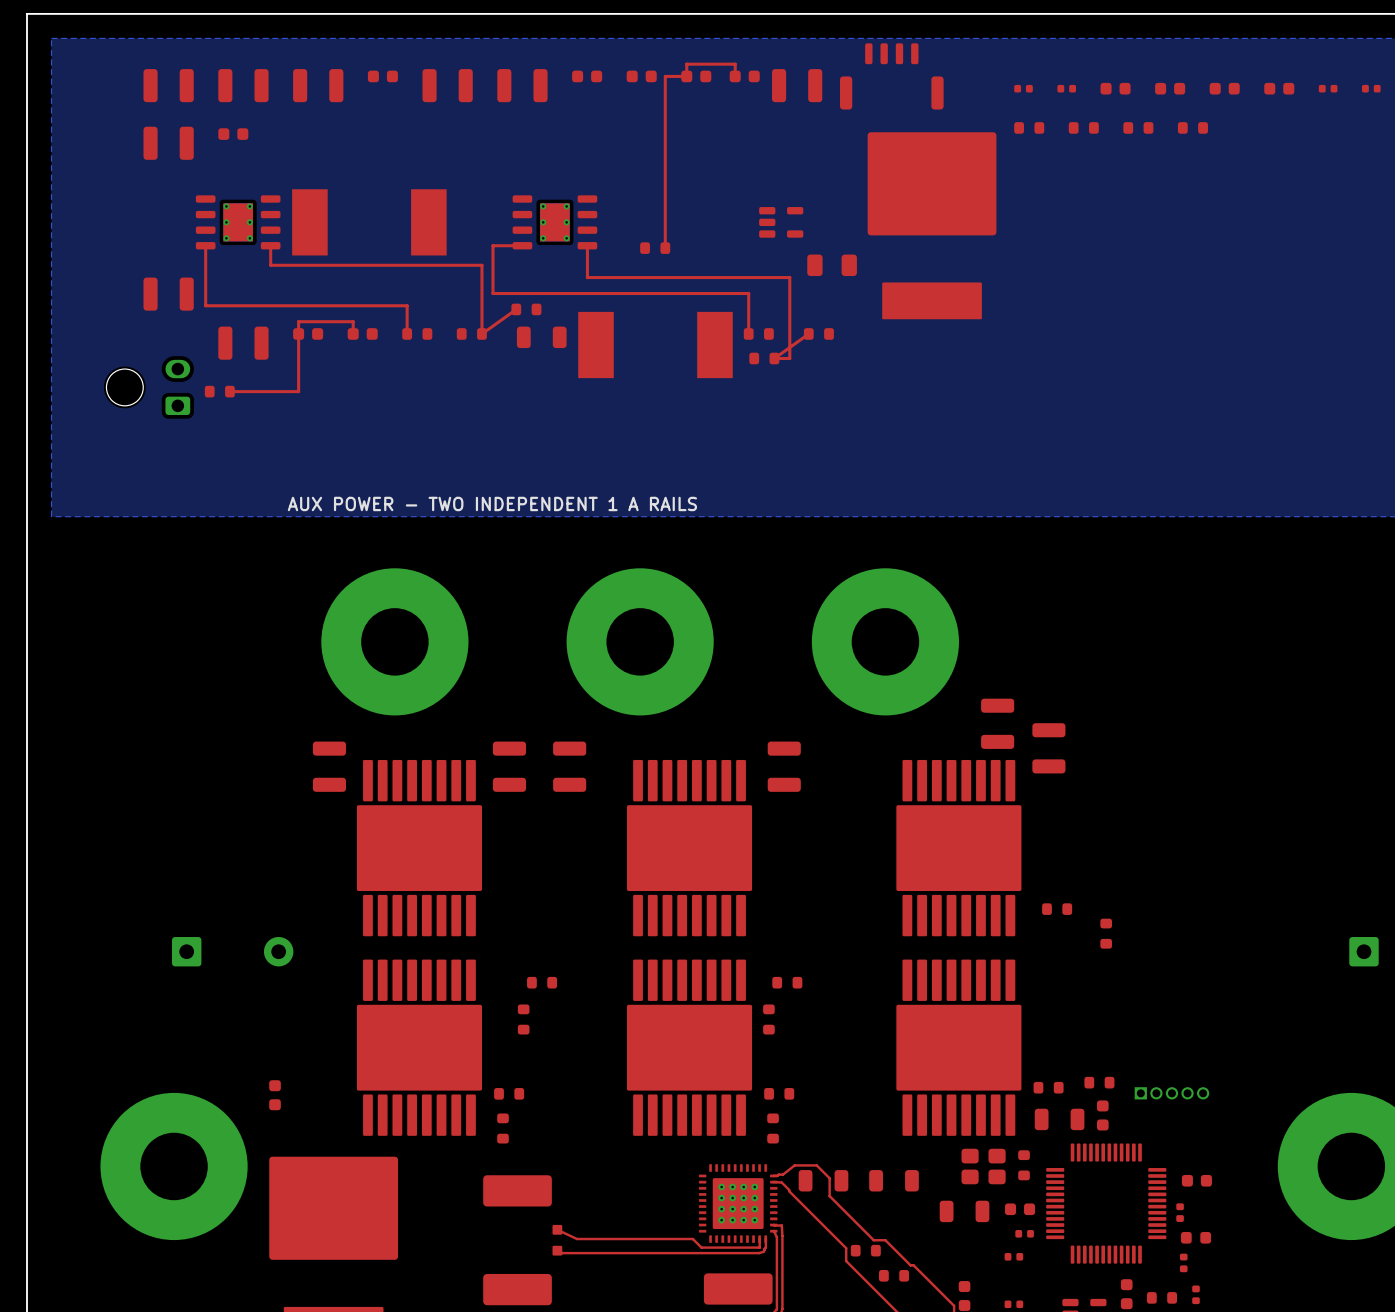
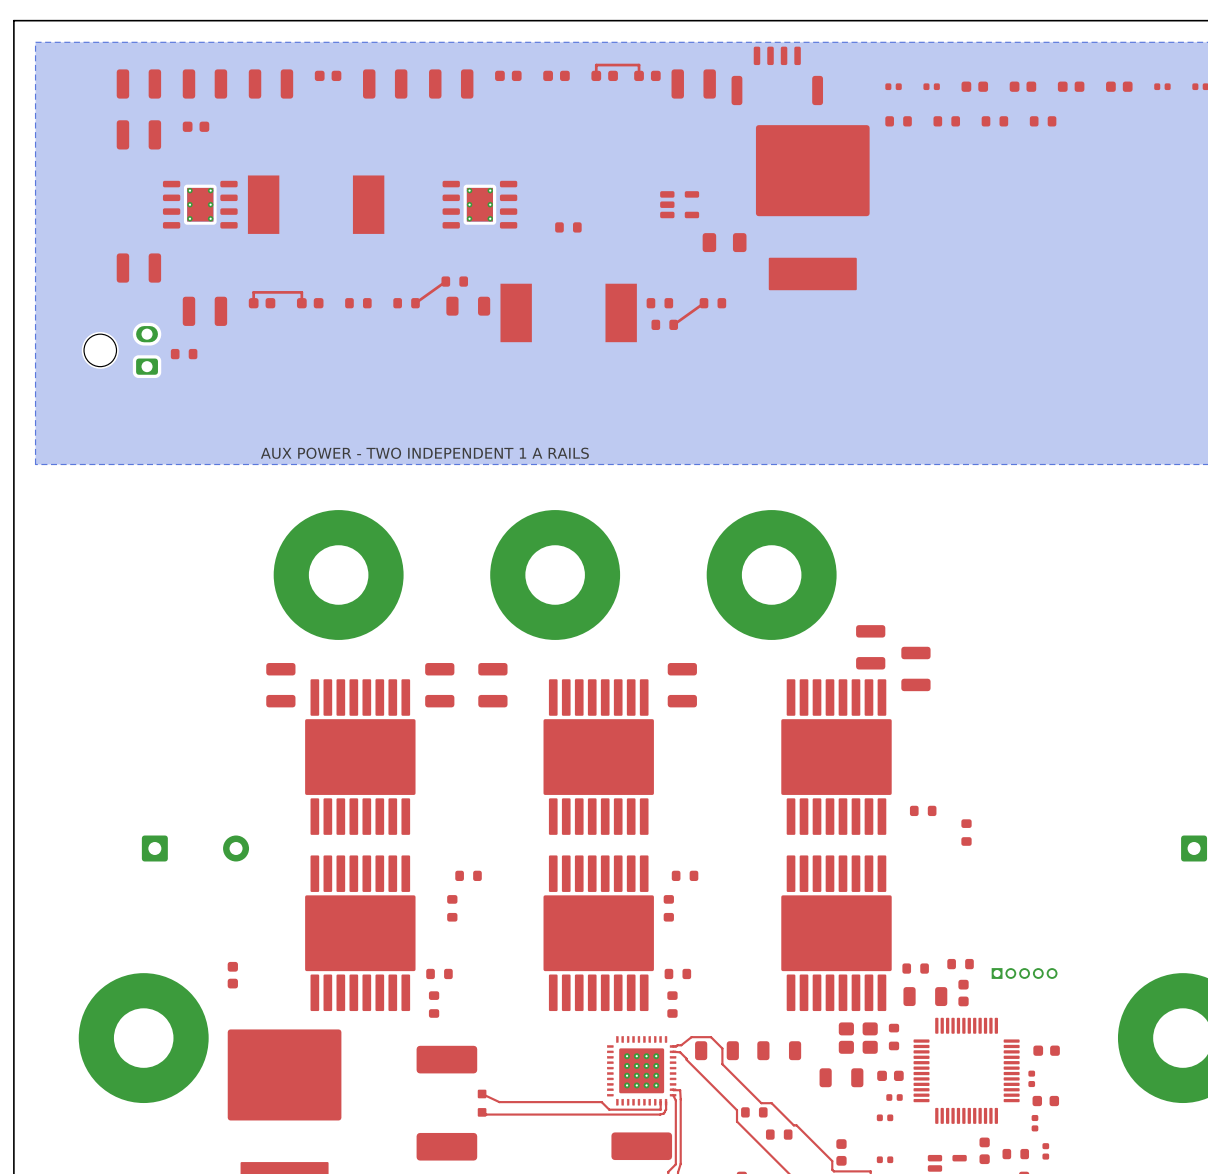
top track: (686, 76) (665, 76) (665, 248) -> none
top track: (205, 245) (205, 305) (407, 305) (407, 333) -> none
top track: (270, 245) (270, 265) (481, 265) (481, 333) -> none
top track: (522, 245) (493, 245) (493, 293) (748, 293) (748, 333) -> none
top track: (587, 245) (587, 277) (789, 277) (789, 358) (774, 358) -> none
top track: (298, 333) (298, 391) (229, 391) -> none

